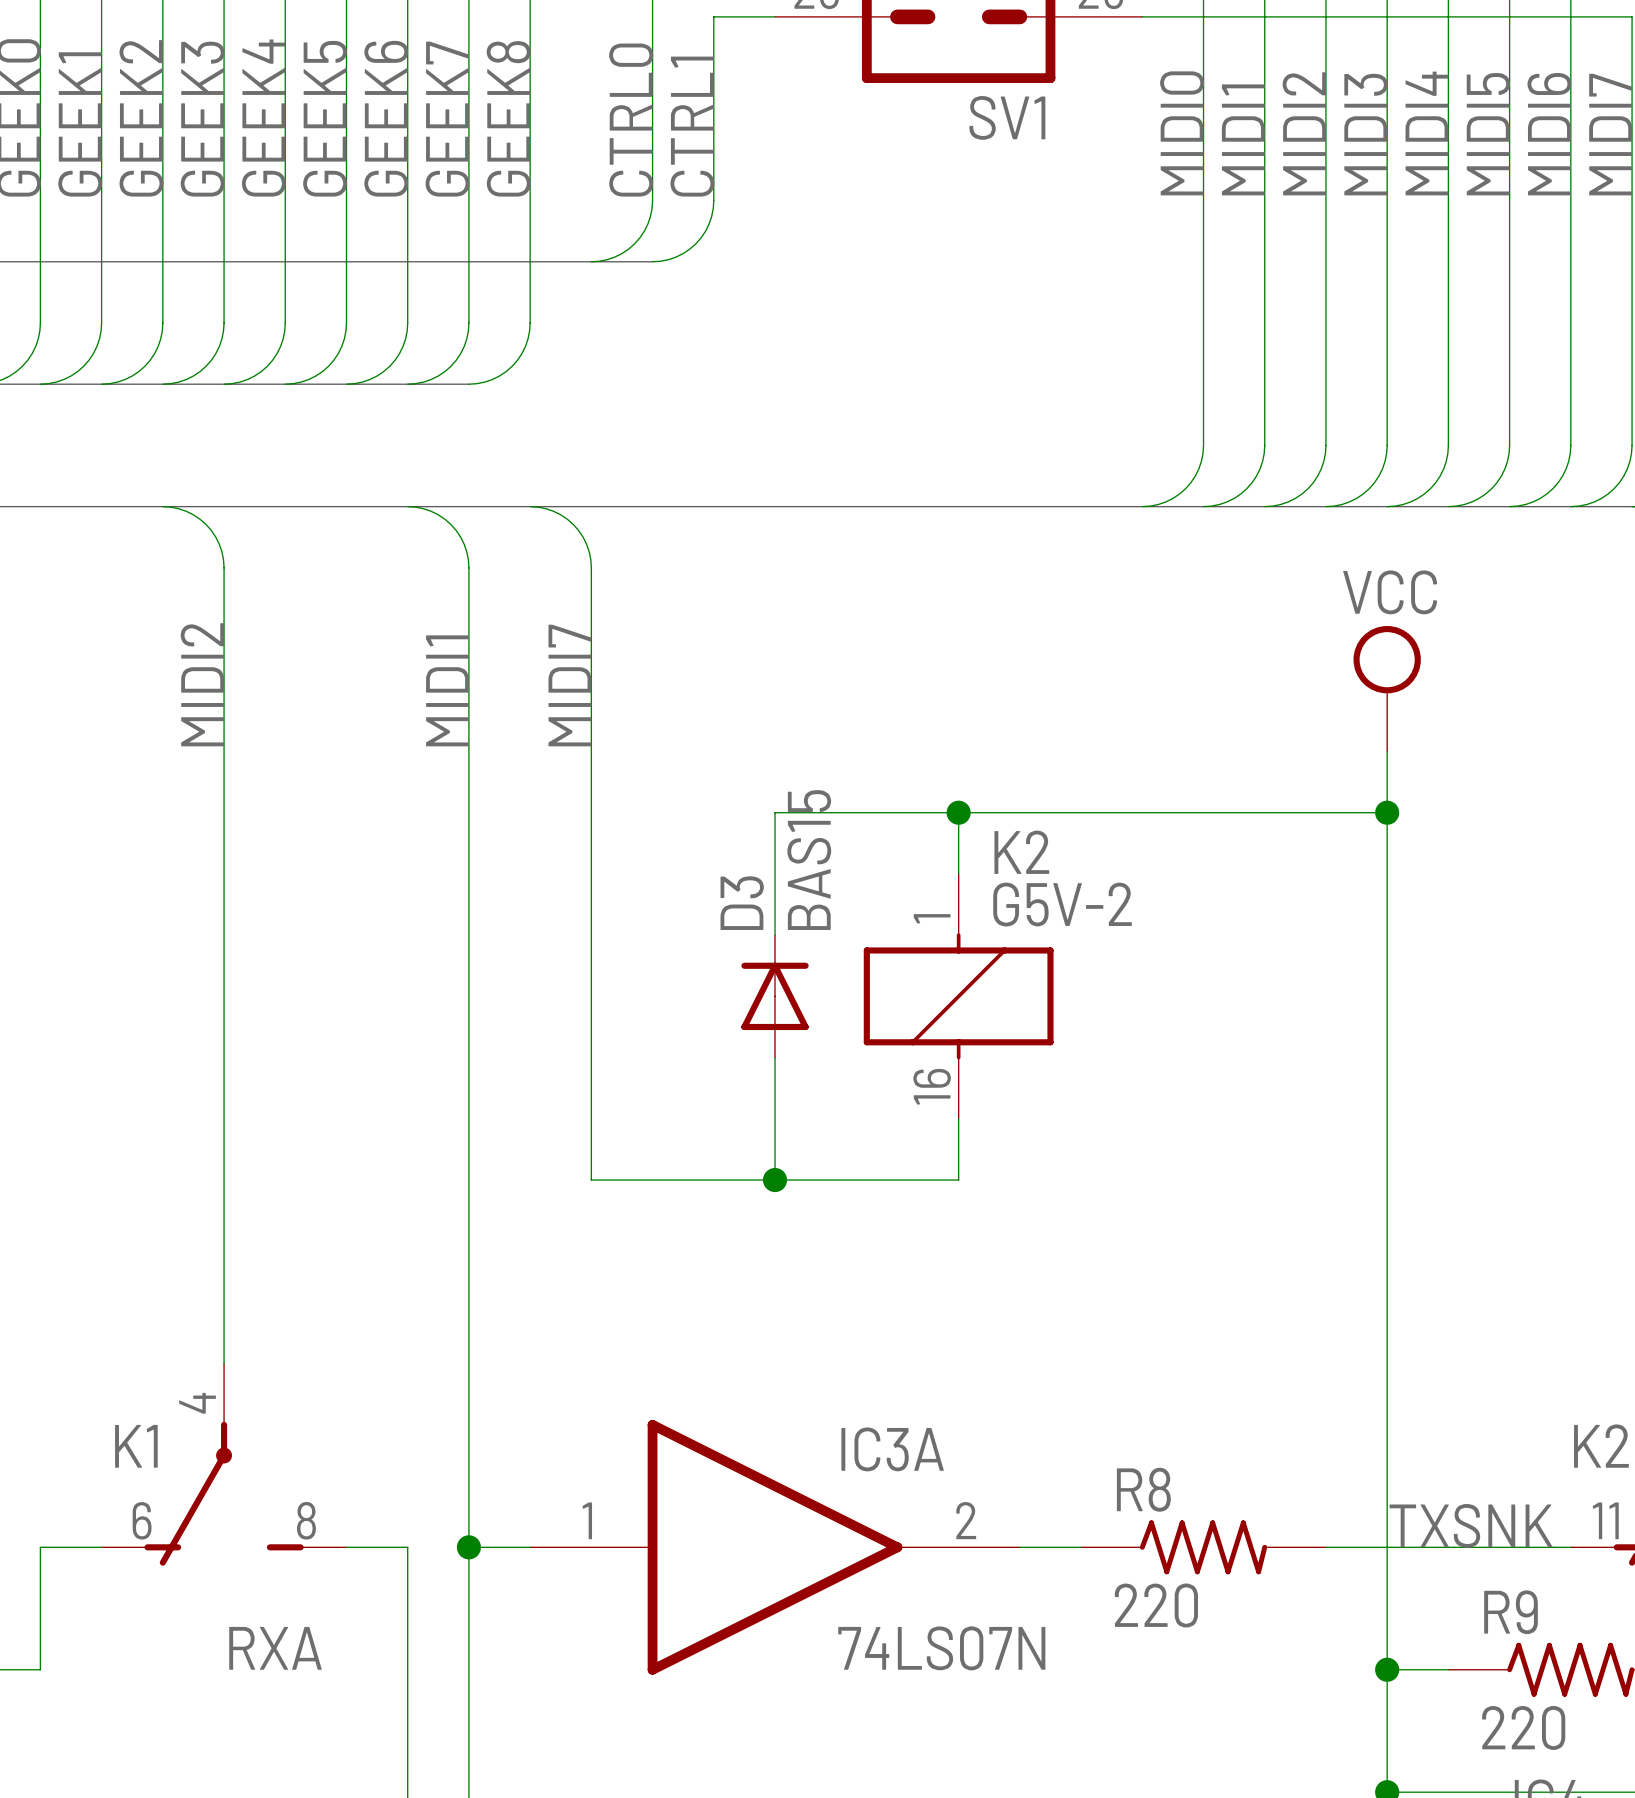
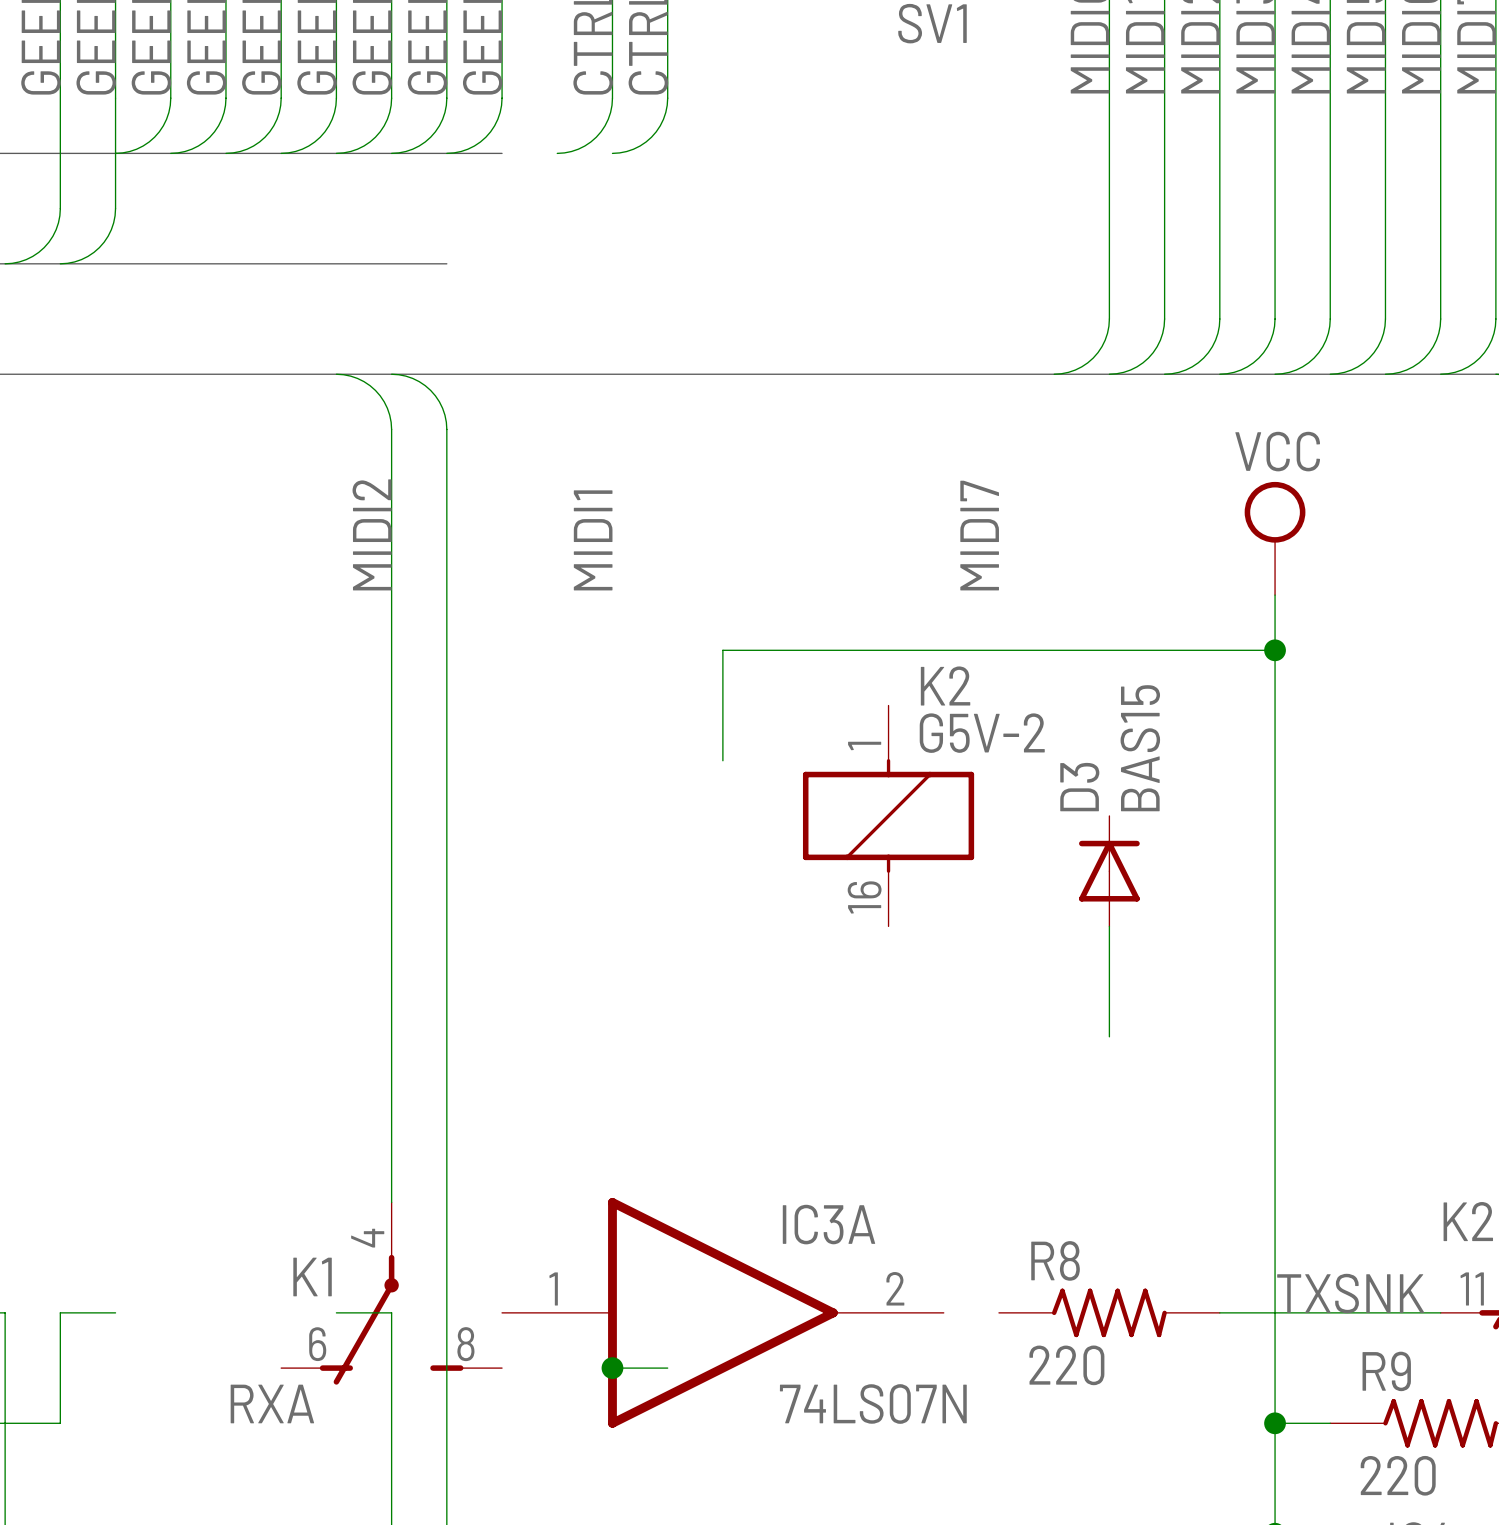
wire: (162, 200) (162, 322) (160, 338) (150, 360) (138, 371) (117, 382) (101, 384) -> (170, 98) (166, 119) (154, 137) (136, 149) (115, 153)
wire: (224, 200) (224, 322) (221, 338) (215, 353) (200, 371) (186, 379) (162, 384) -> (225, 98) (221, 119) (209, 137) (191, 149) (170, 153)
wire: (285, 200) (285, 322) (283, 338) (272, 360) (261, 371) (239, 382) (224, 384) -> (281, 98) (276, 119) (265, 137) (247, 149) (225, 153)
wire: (346, 200) (346, 322) (344, 338) (333, 360) (322, 371) (301, 382) (285, 384) -> (336, 98) (332, 119) (320, 137) (302, 149) (281, 153)
wire: (407, 200) (407, 322) (405, 338) (399, 353) (383, 371) (369, 379) (346, 384) -> (391, 98) (387, 119) (375, 137) (357, 149) (336, 153)
wire: (468, 200) (468, 322) (466, 338) (456, 360) (444, 371) (423, 382) (407, 384) -> (446, 98) (442, 119) (430, 137) (412, 149) (391, 153)
wire: (530, 200) (530, 322) (528, 338) (517, 360) (506, 371) (484, 382) (468, 384) -> (502, 98) (497, 119) (485, 137) (467, 149) (446, 153)
bus: (530, 261) (652, 261) -> none
wire: (162, 506) (186, 511) (206, 524) (215, 537) (223, 559) (224, 1363) -> none
wire: none -> (336, 374) (357, 378) (375, 390) (384, 401) (391, 422) (391, 1202)
wire: (530, 506) (553, 511) (573, 524) (583, 537) (590, 559) (591, 1180) (958, 1180) (958, 1118) -> none
label position: MIDI2 (202, 684) -> MIDI2 (372, 534)
label position: MIDI7 (569, 685) -> MIDI7 (979, 535)
label position: MIDI1 (447, 690) -> MIDI1 (593, 540)
wire: (958, 812) (958, 873) -> none
junction: (958, 812) -> none
D3 position: (775, 996) -> (1109, 871)
wire: (775, 1057) (775, 1180) -> (1109, 926) (1109, 1036)
junction: (775, 1180) -> none
K1 position: (224, 1464) -> (391, 1293)
wire: (468, 1547) (530, 1547) -> none
junction: (468, 1547) -> none
wire: (1019, 1547) (1081, 1547) -> (612, 1368) (667, 1368)
junction: none -> (612, 1368)

